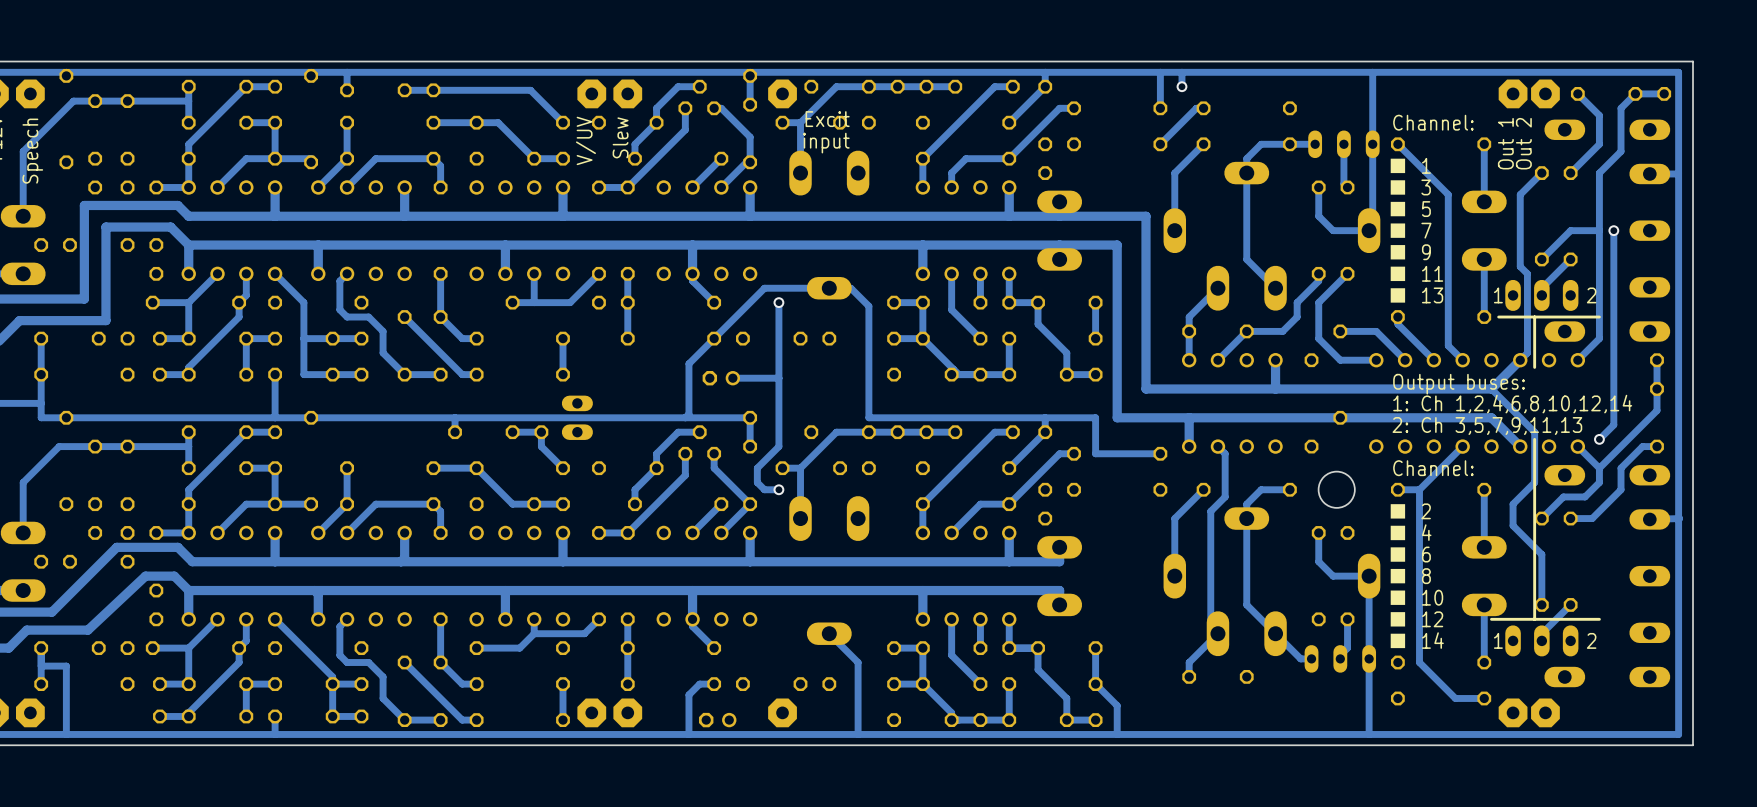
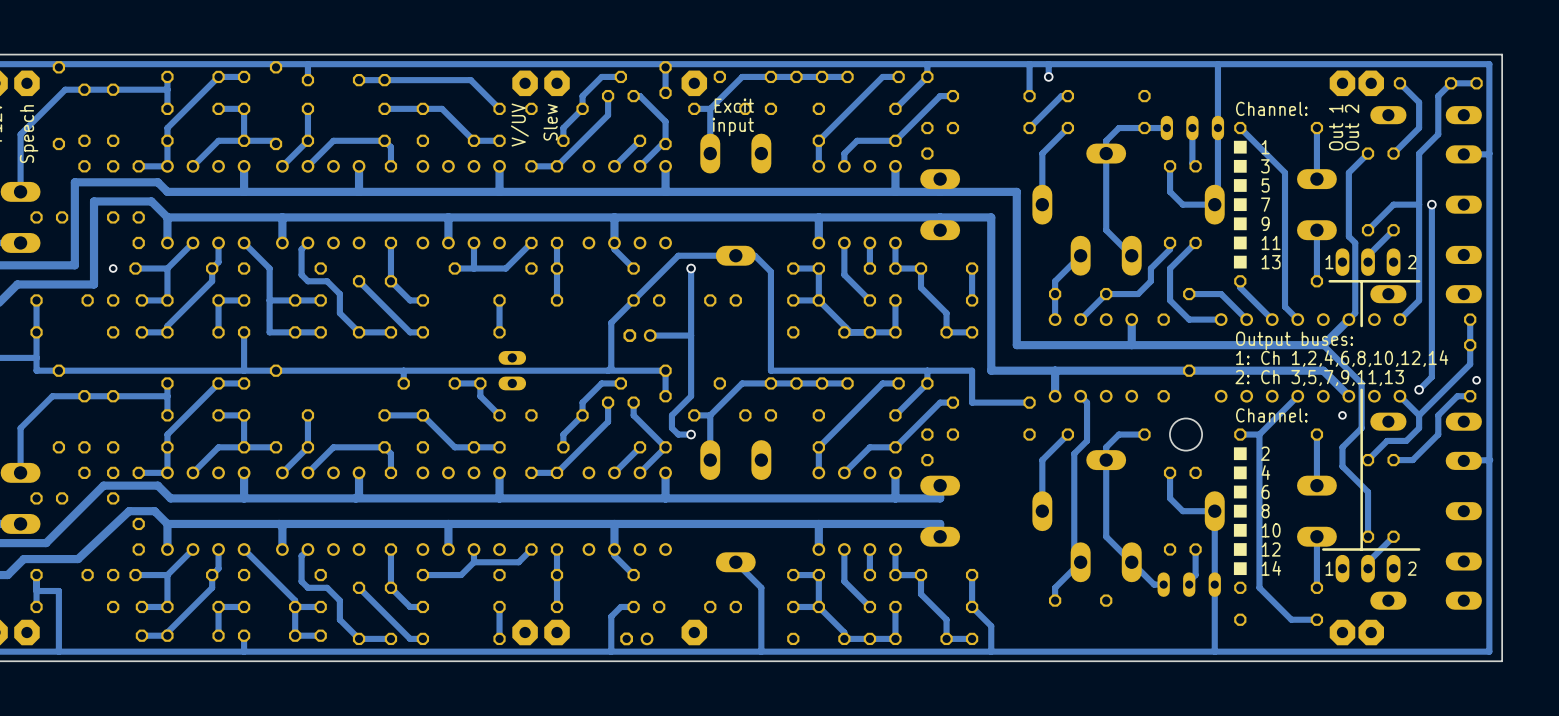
via: none -> (113, 268)
via: none -> (1476, 380)
via: none -> (1342, 415)

